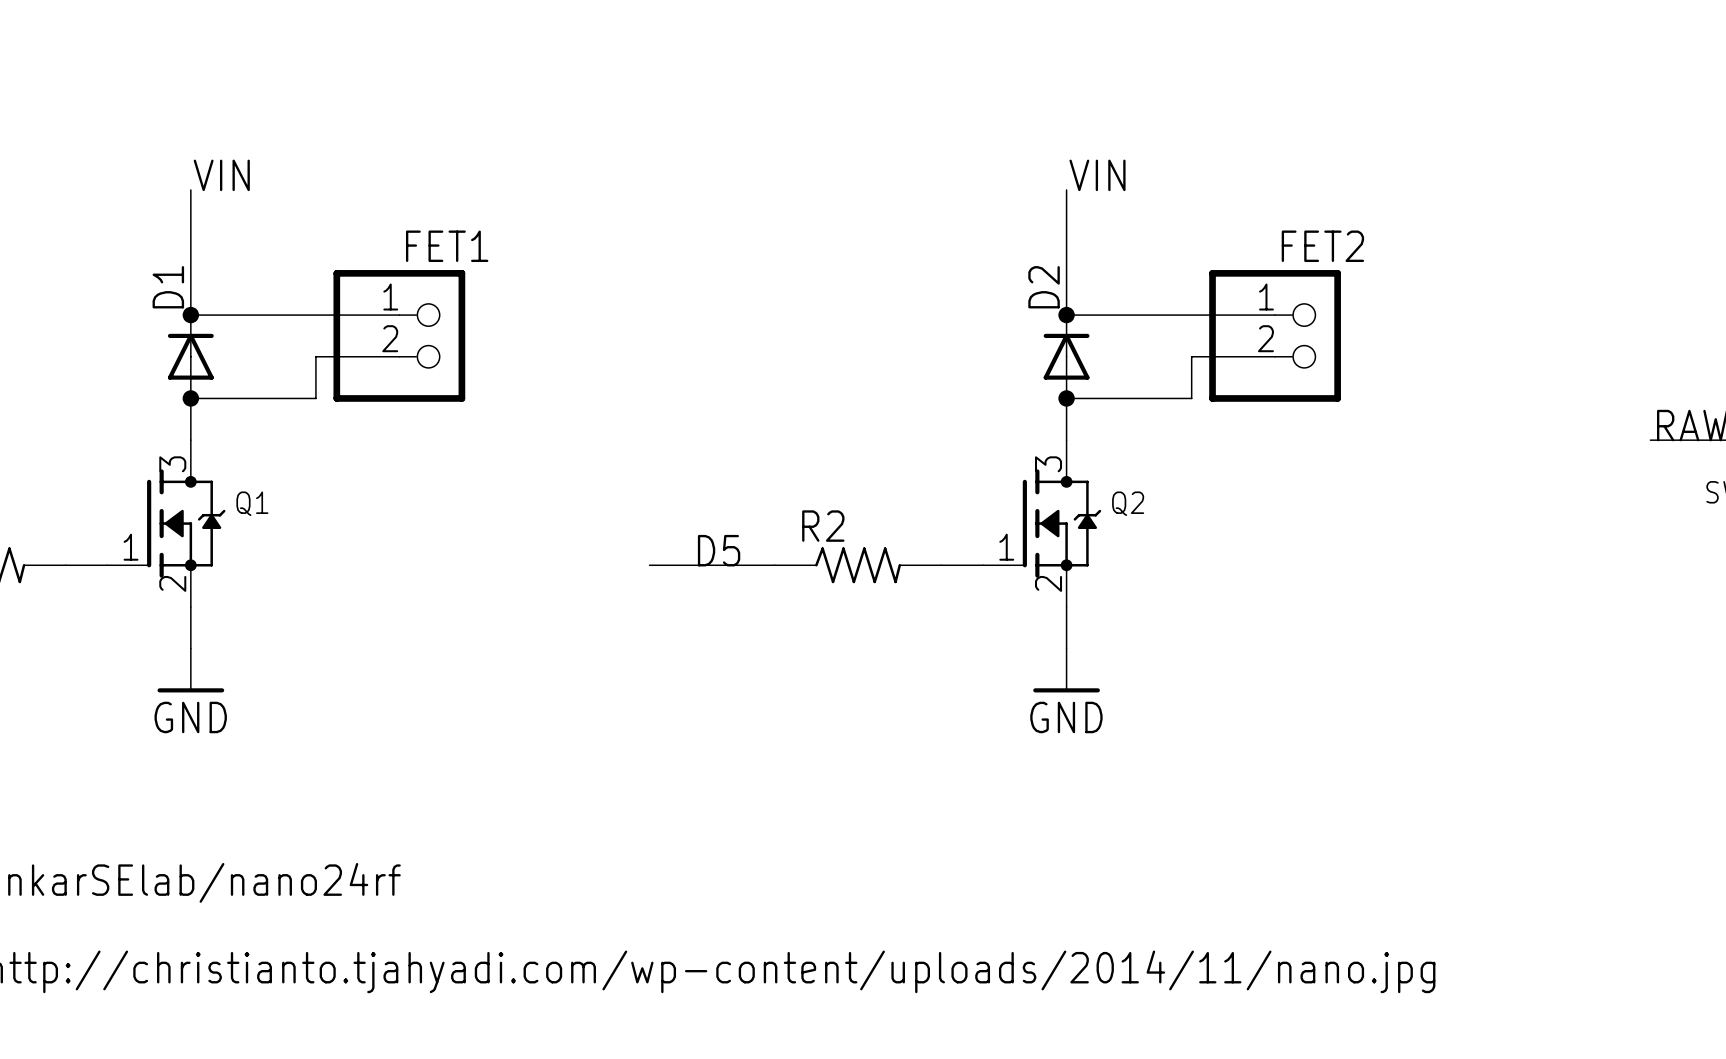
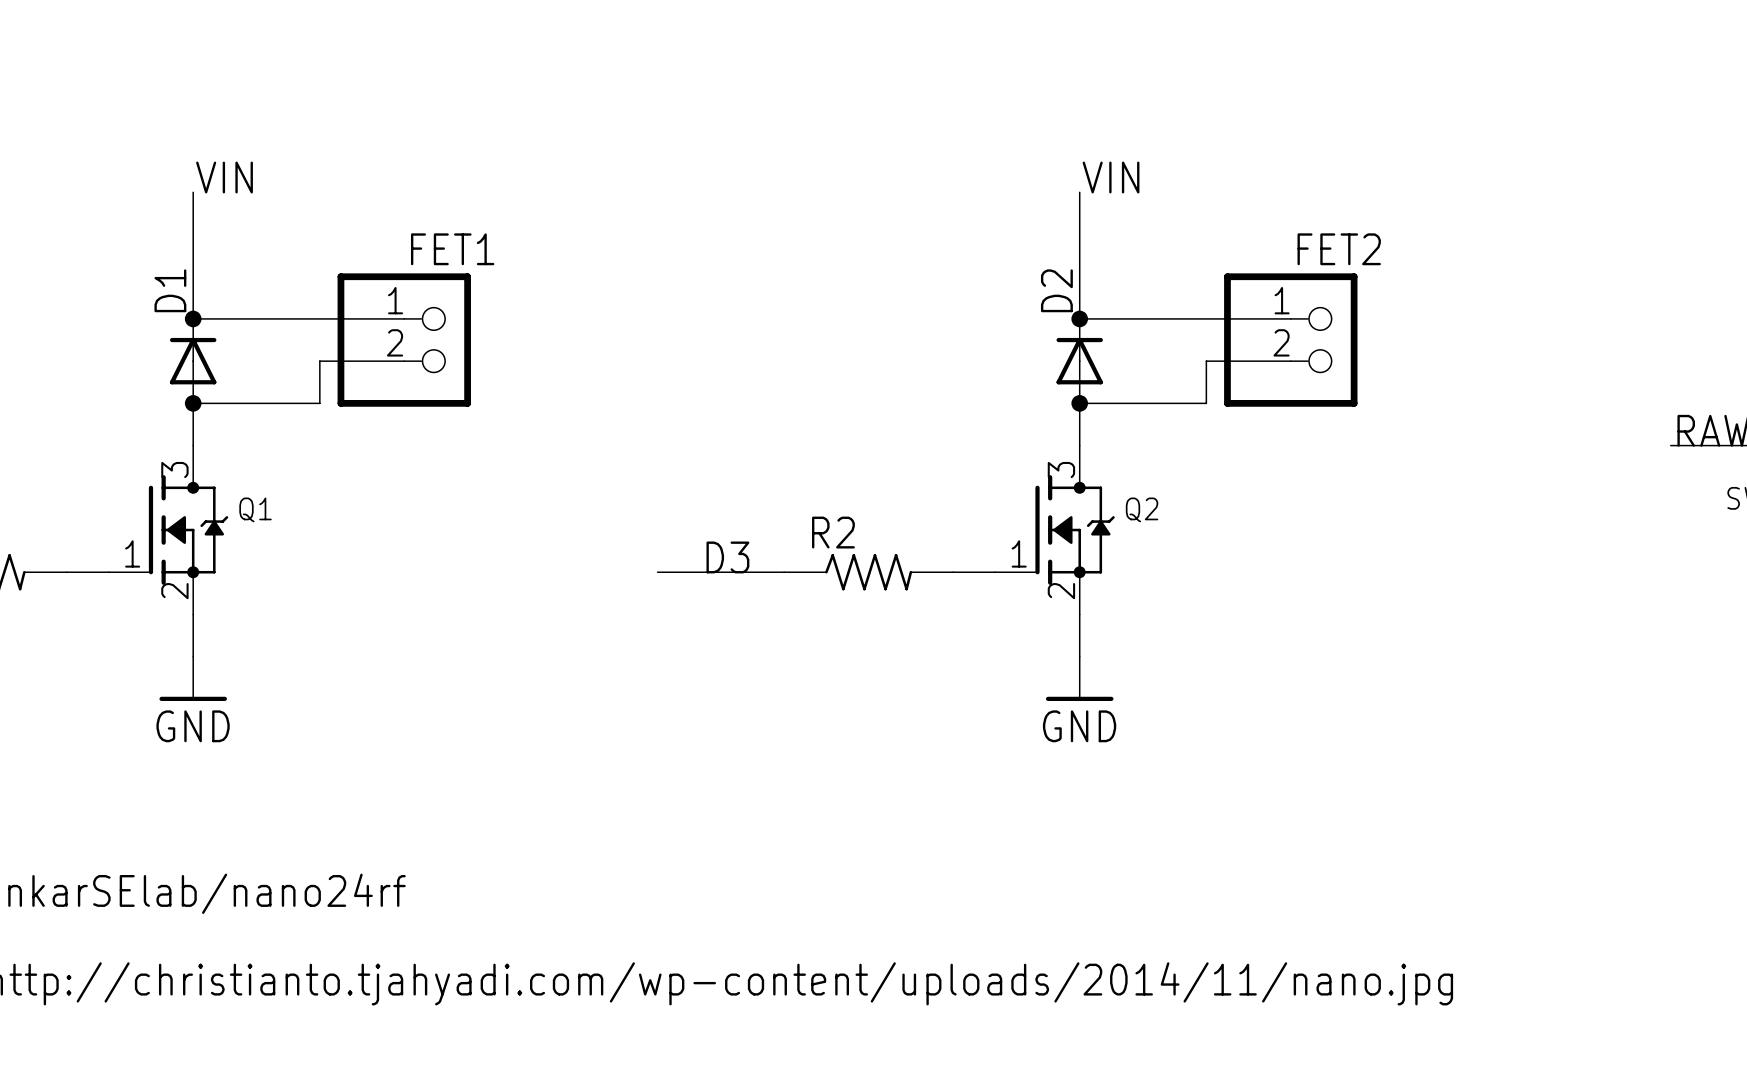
label: D5 (719, 550) -> D3 (727, 557)

